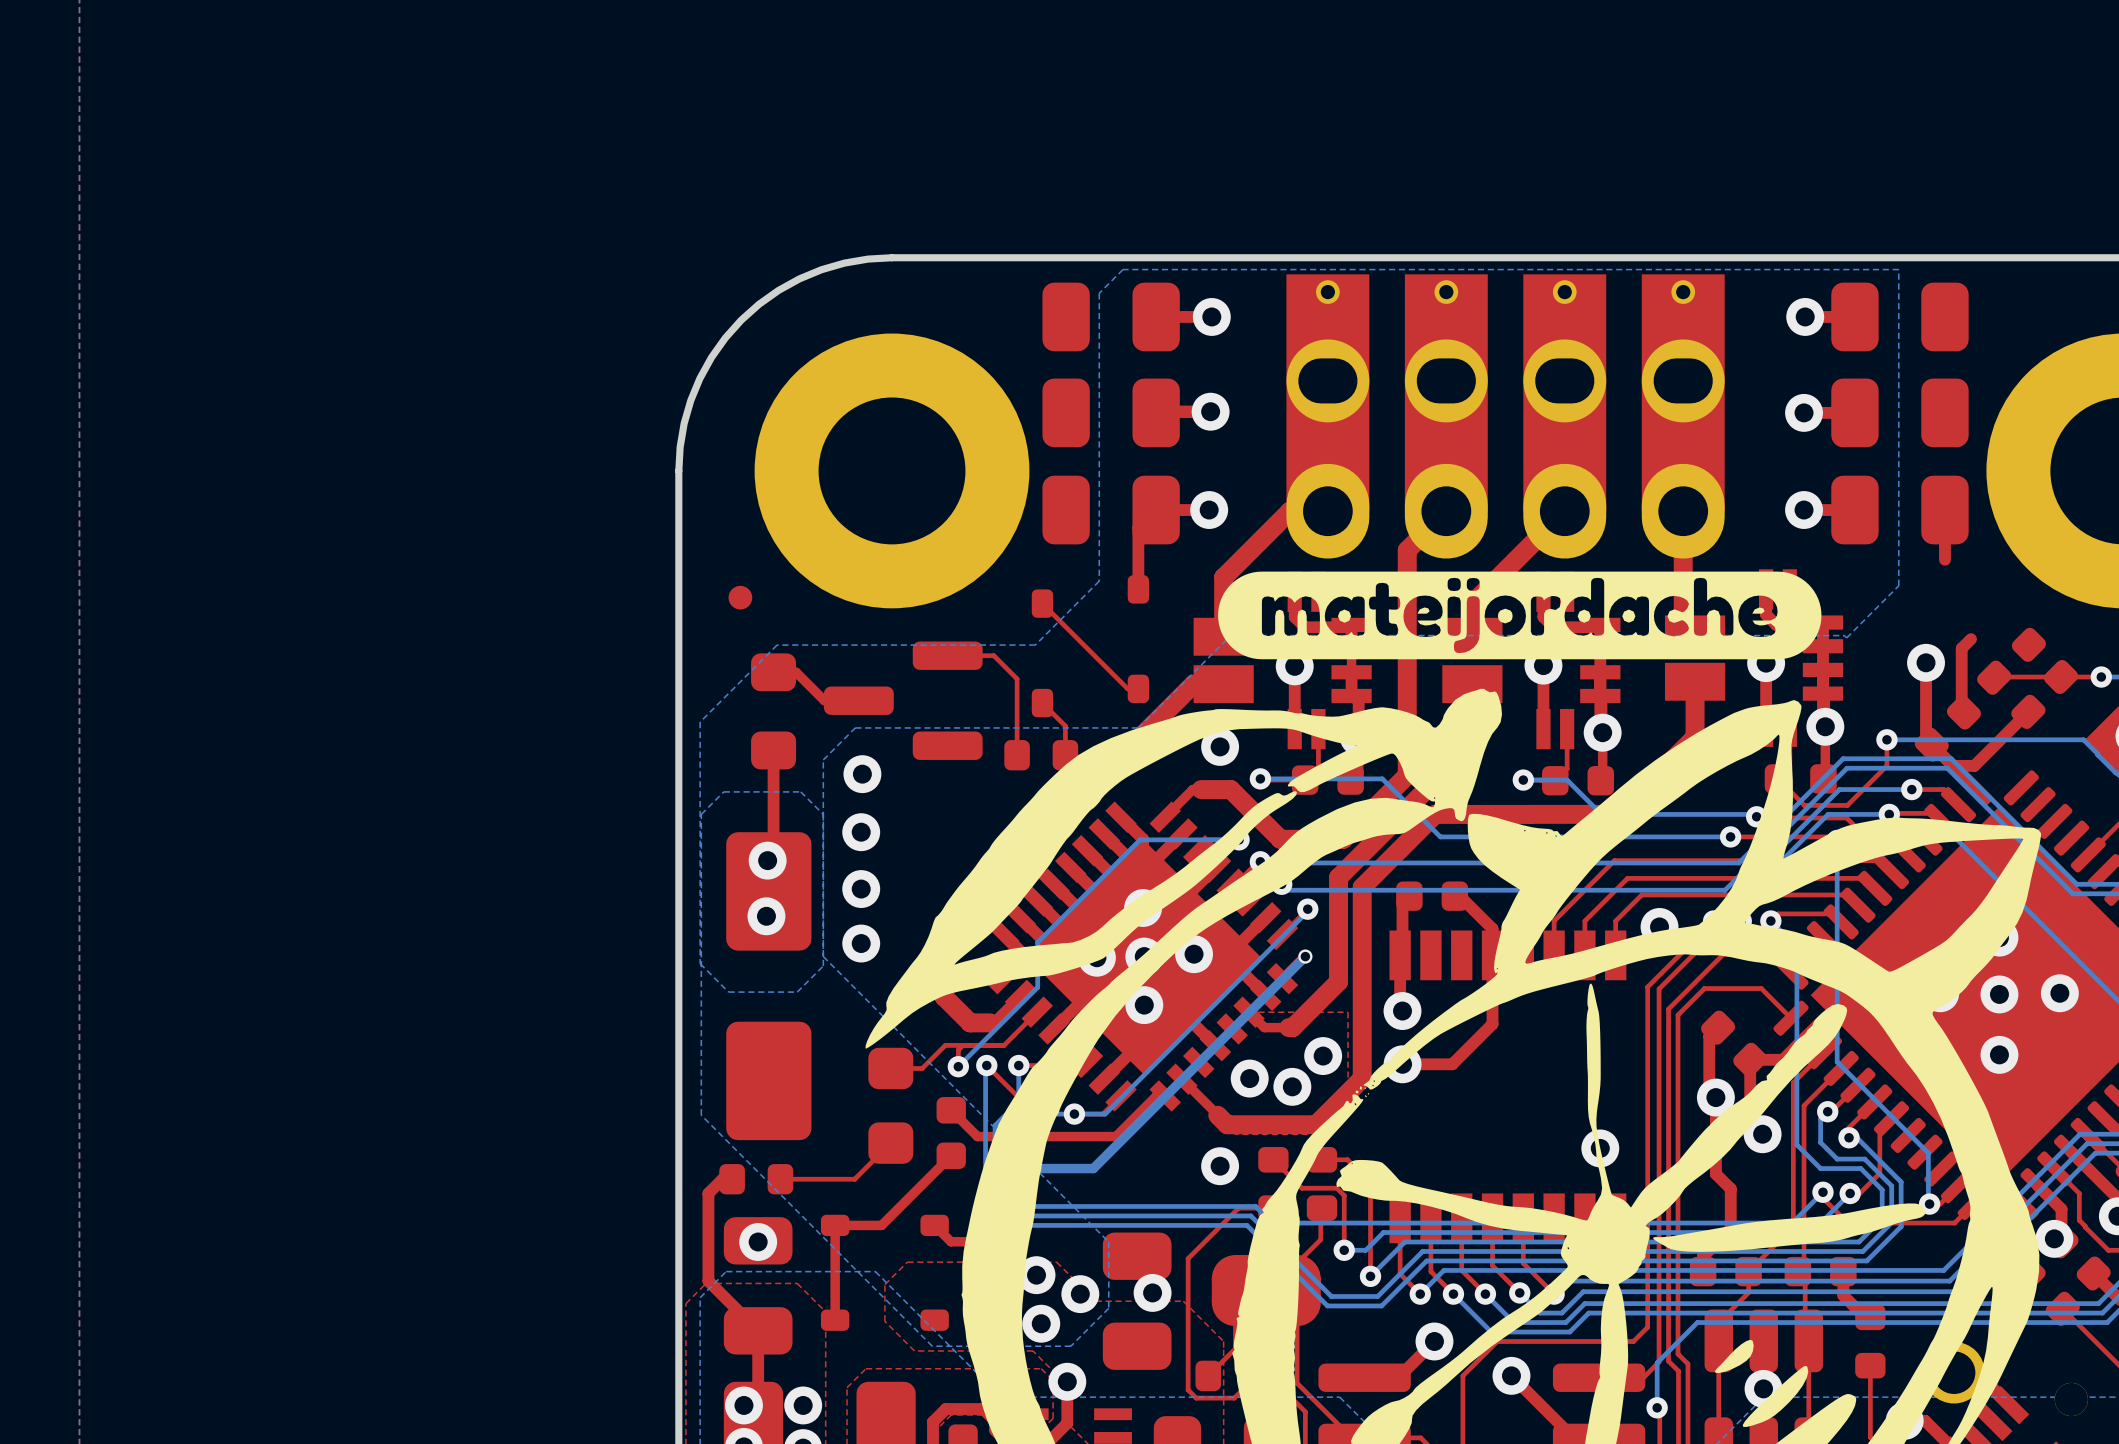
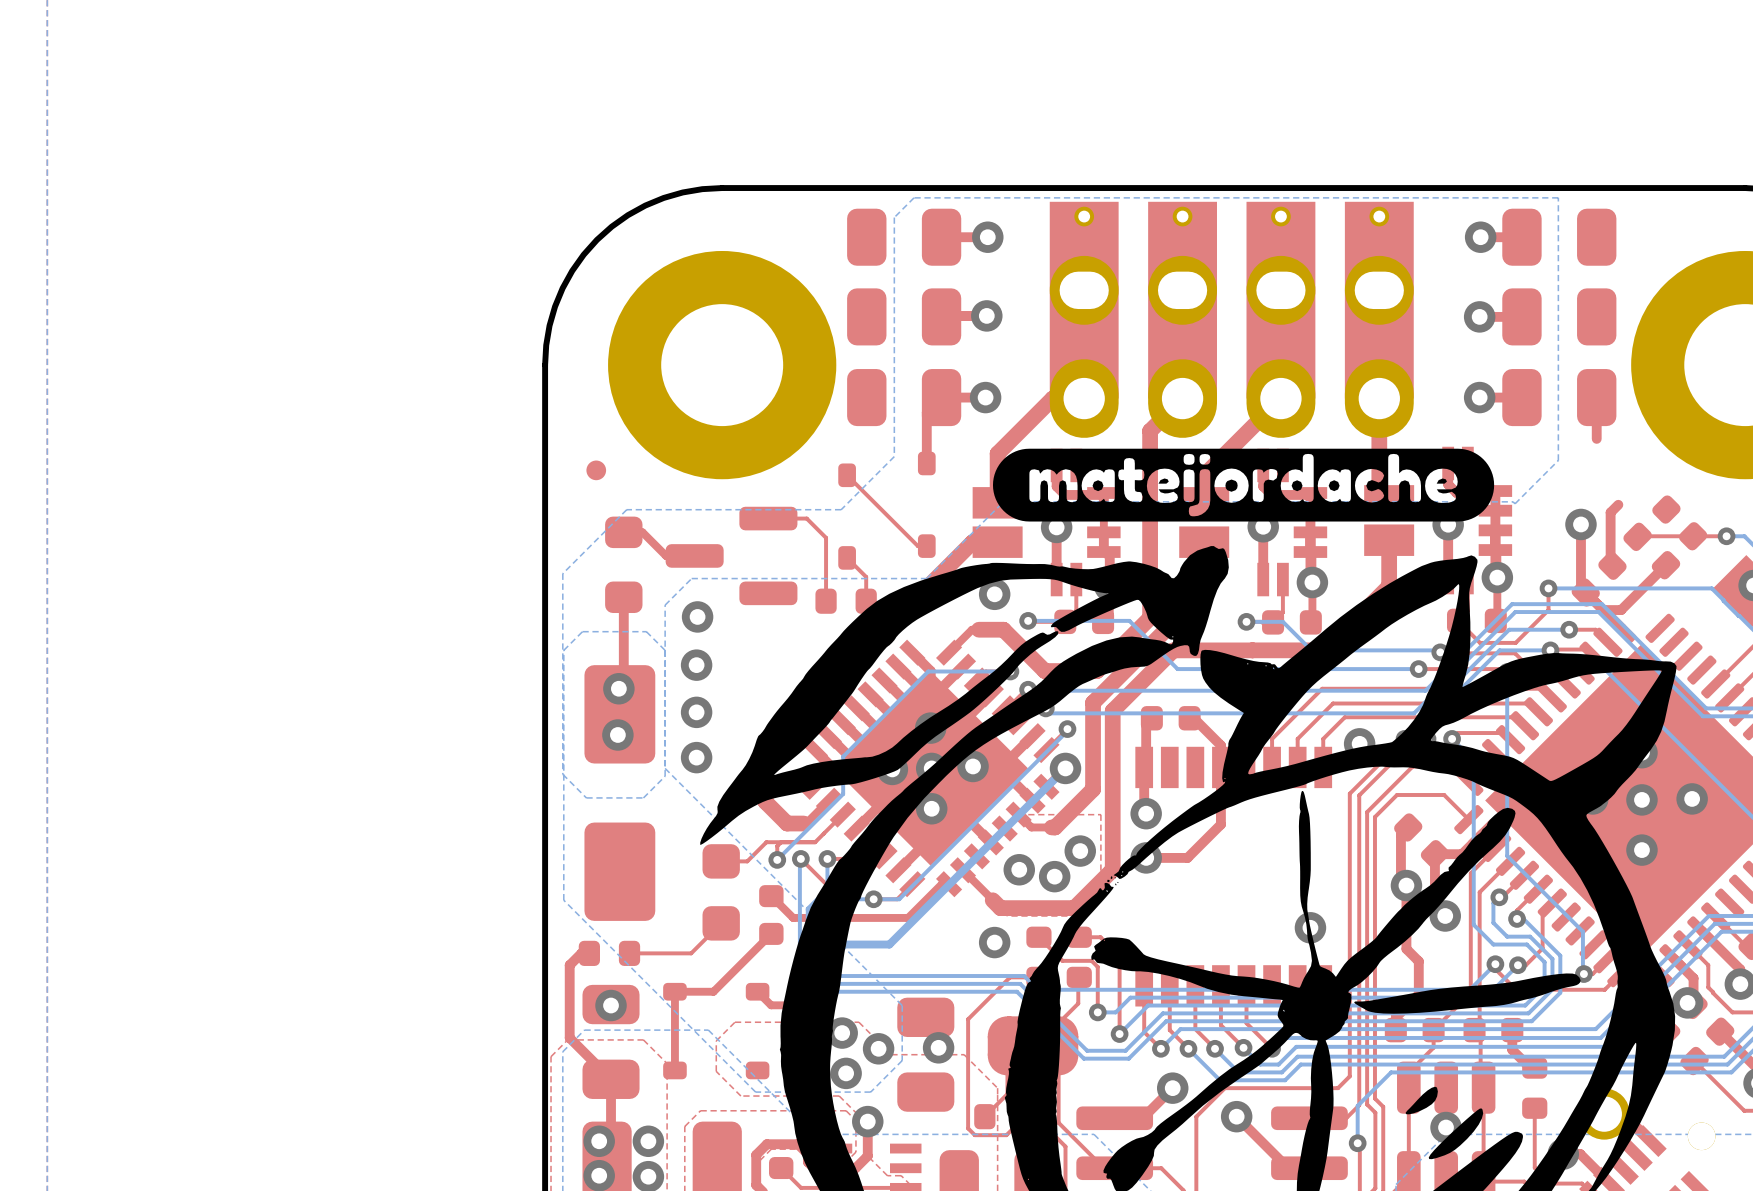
via size: [1298, 949, 1313, 964] -> [1049, 752, 1082, 785]

